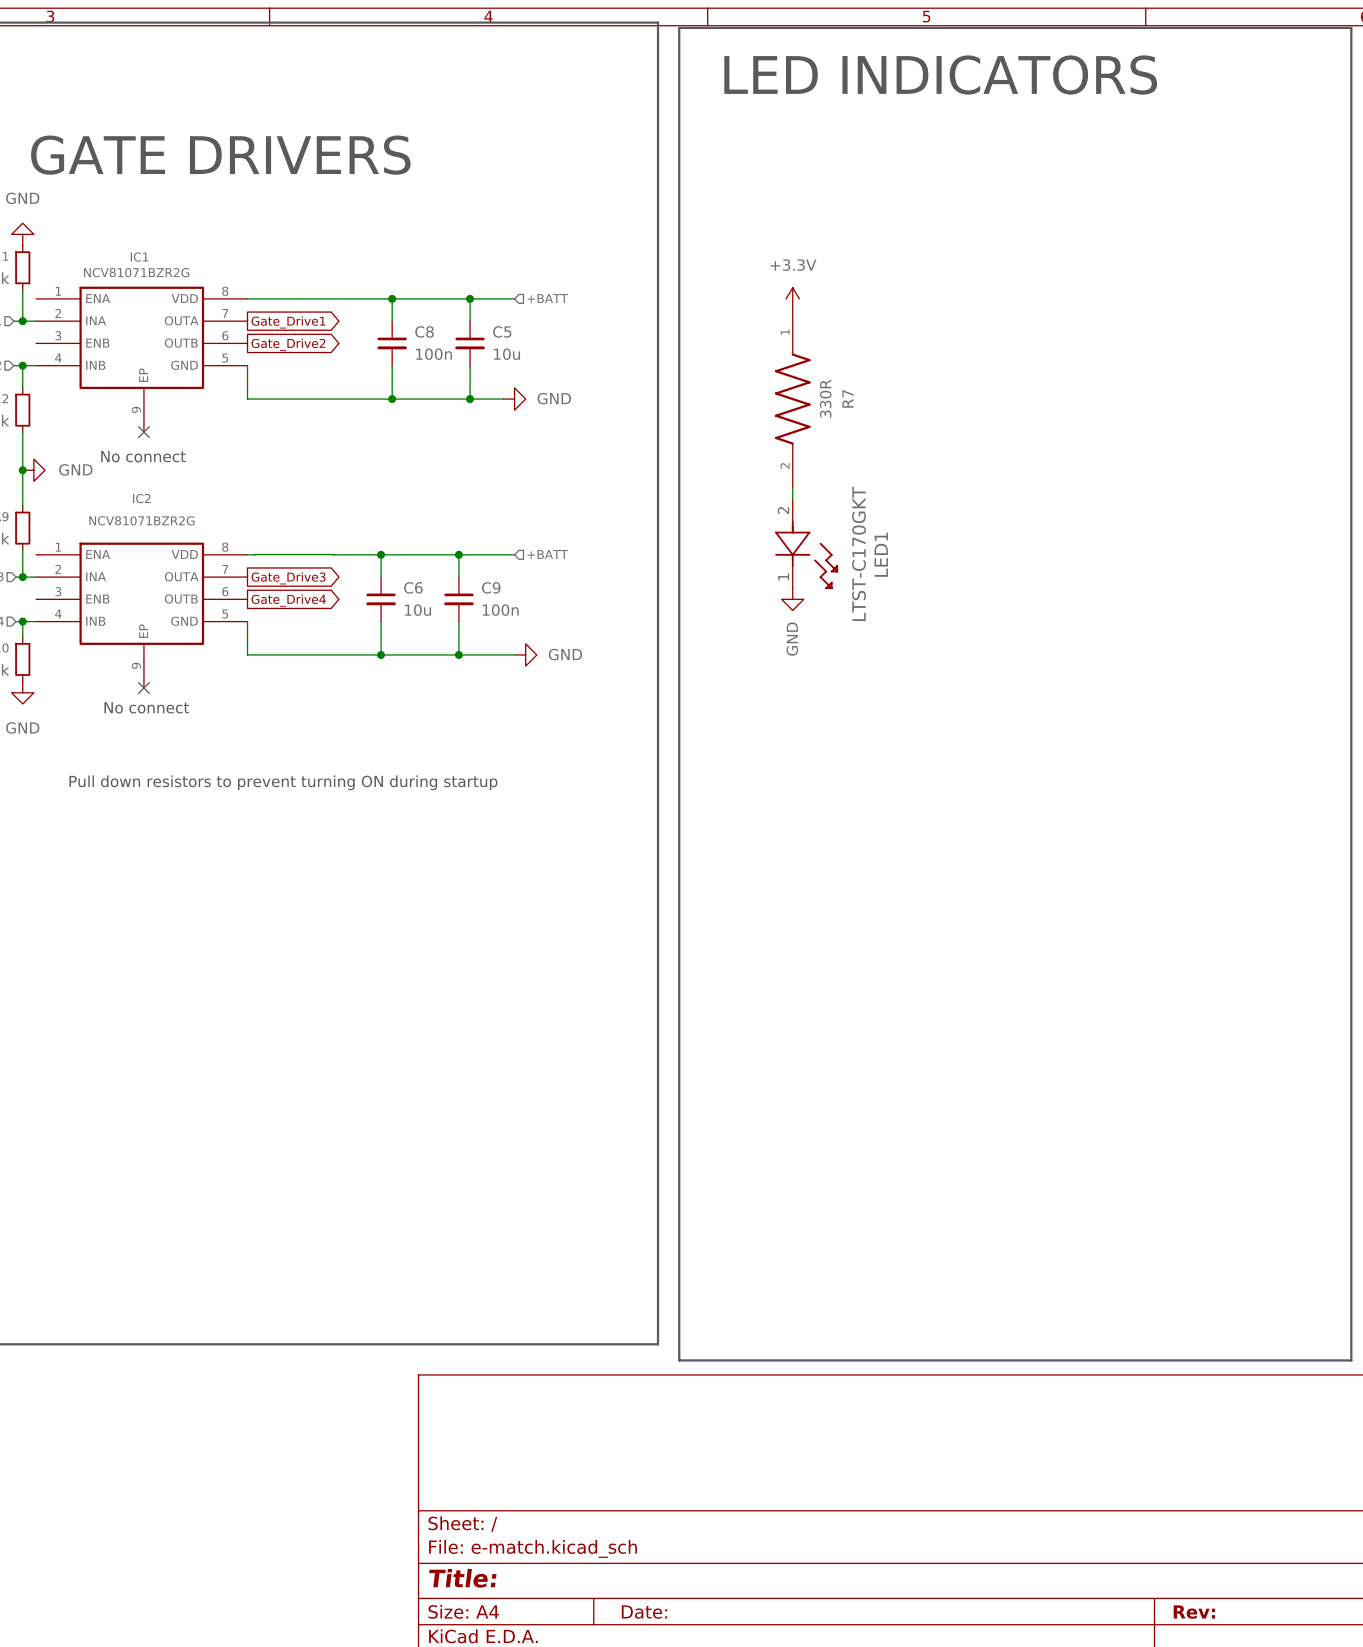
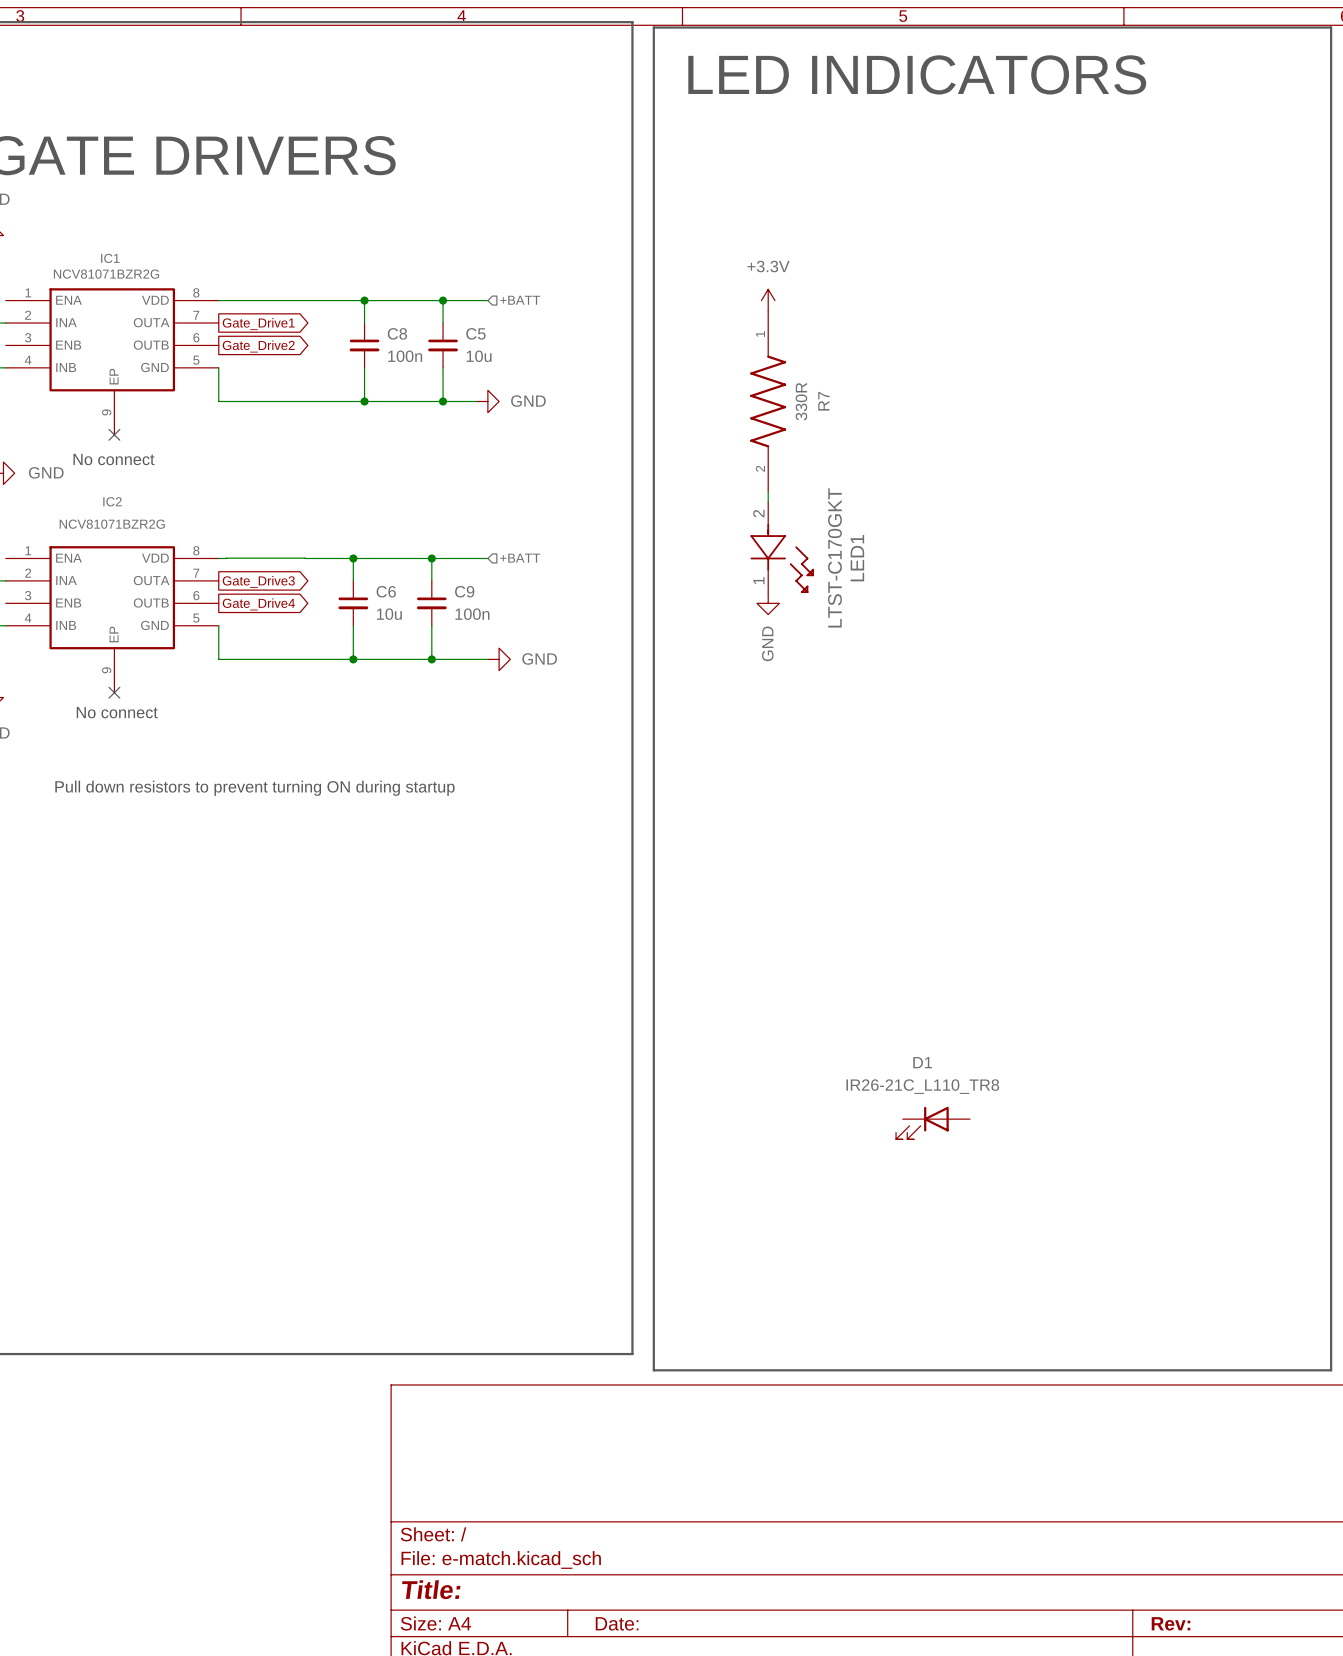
D1: none -> IR26-21C_L110_TR8 (933, 1123)

